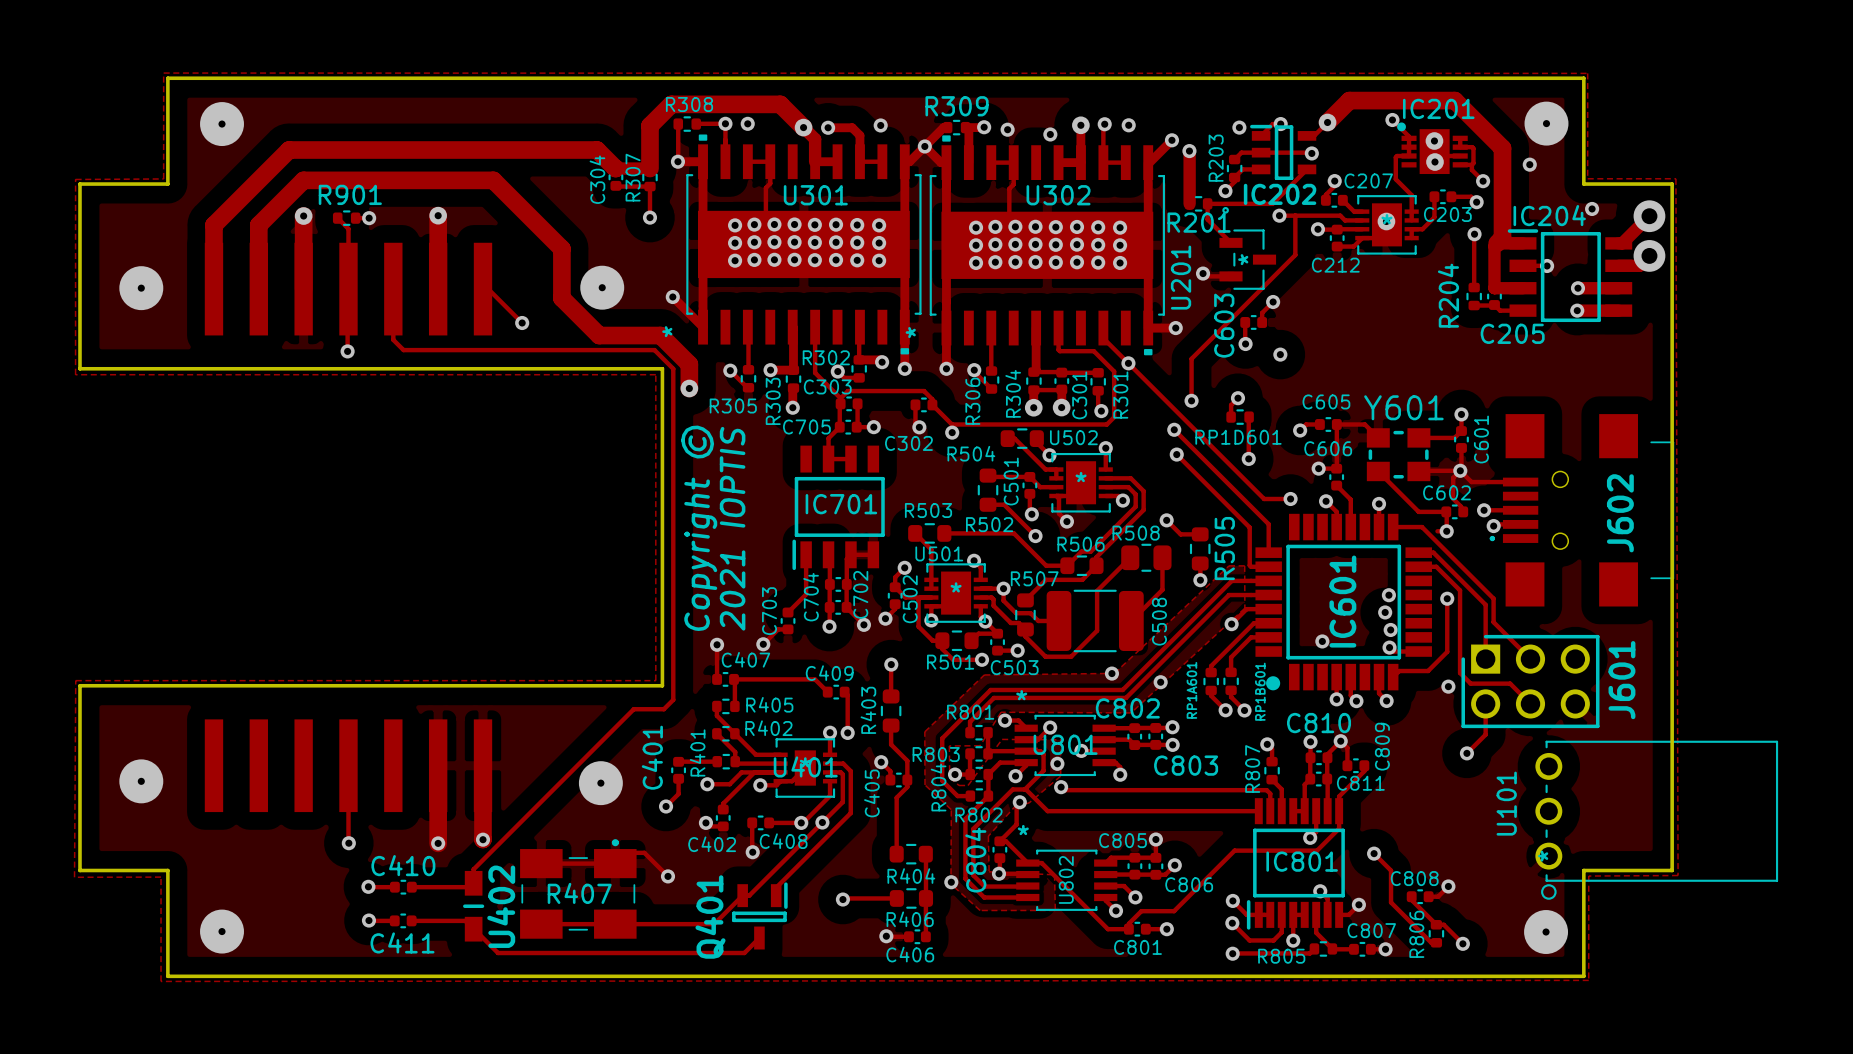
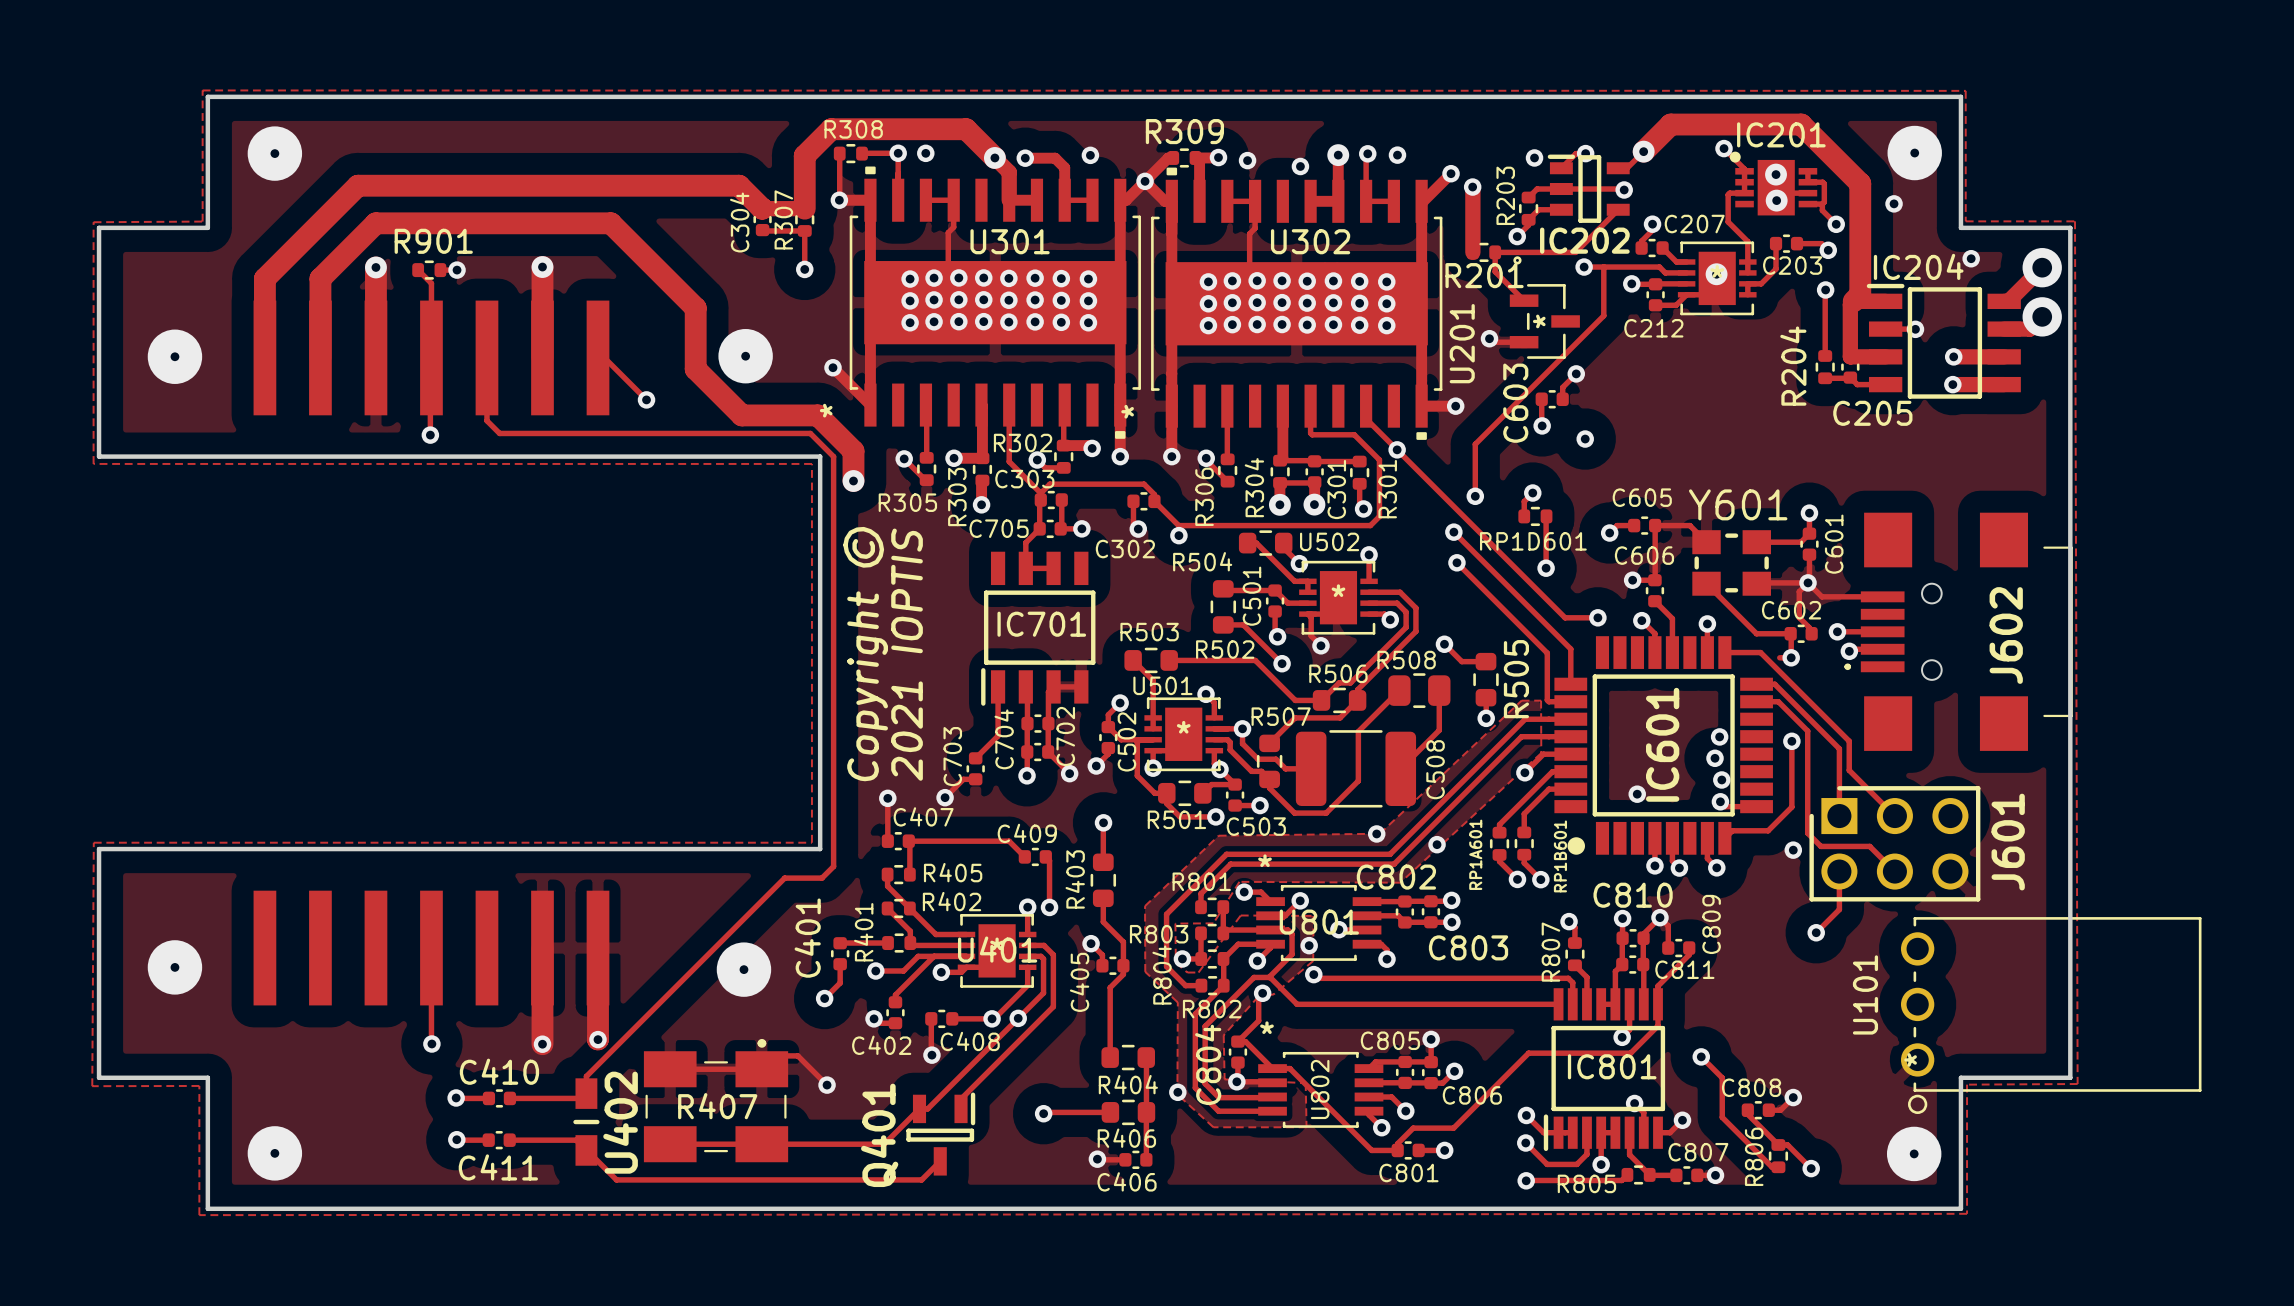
U401 footprint: [773, 738, 838, 798] -> [957, 914, 1037, 988]

